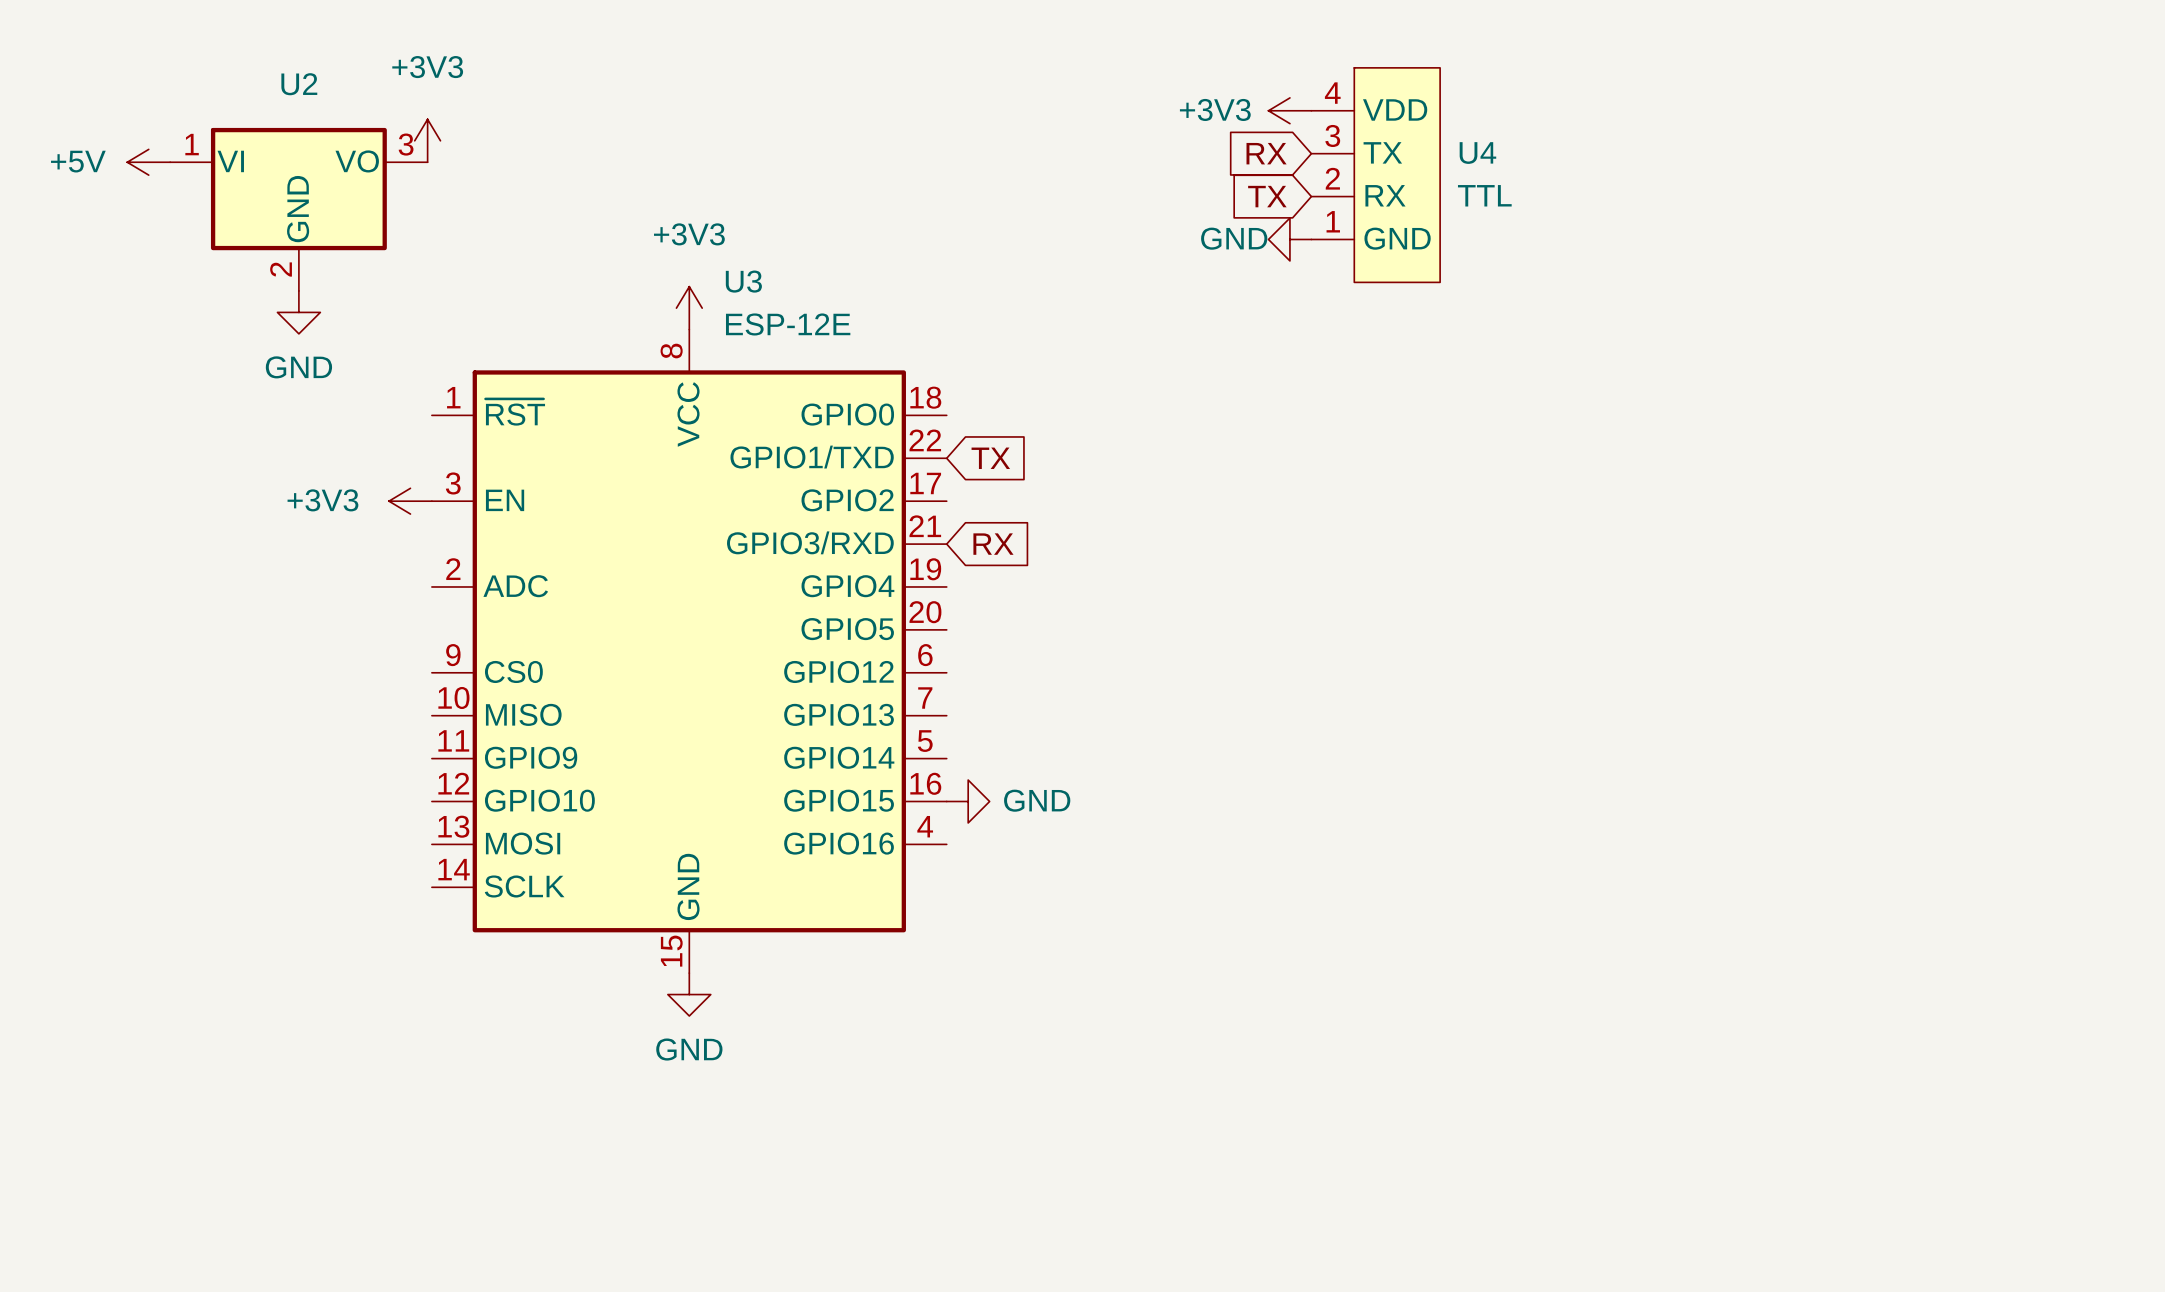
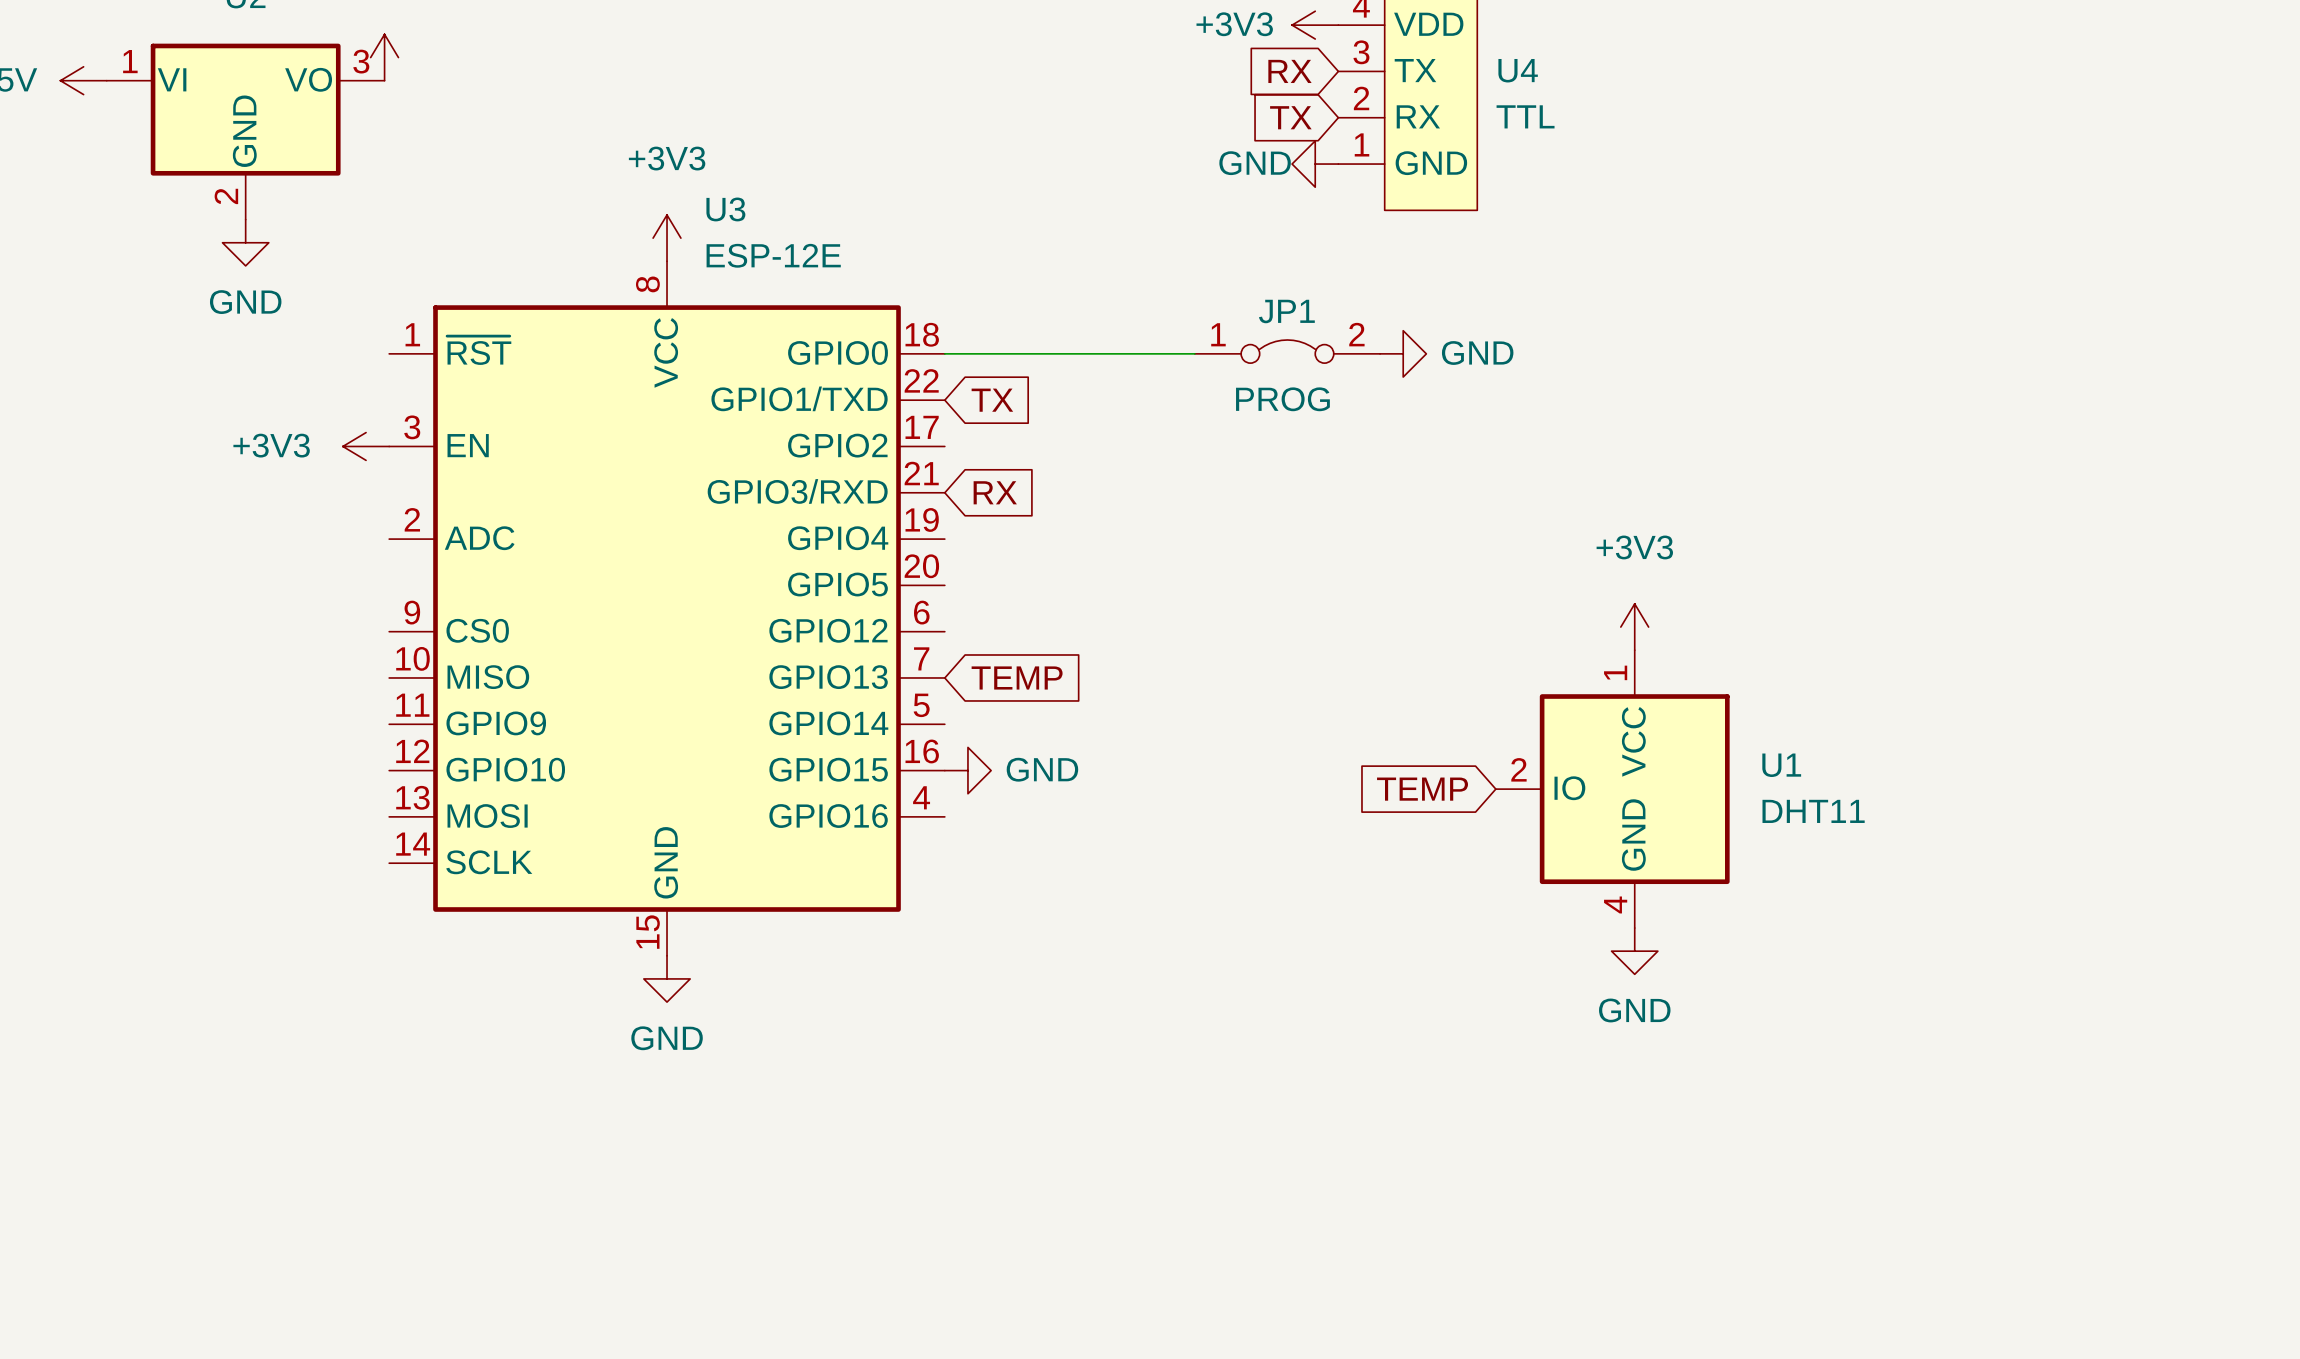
JP1: none -> PROG (1287, 351)
wire: none -> (944, 353) (1194, 353)
power symbol: none -> GND (1403, 353)
power symbol: none -> +3V3 (1634, 627)
global label: none -> TEMP (1017, 677)
global label: none -> TEMP (1422, 789)
U1: none -> DHT11 (1612, 789)
power symbol: none -> GND (1634, 951)

